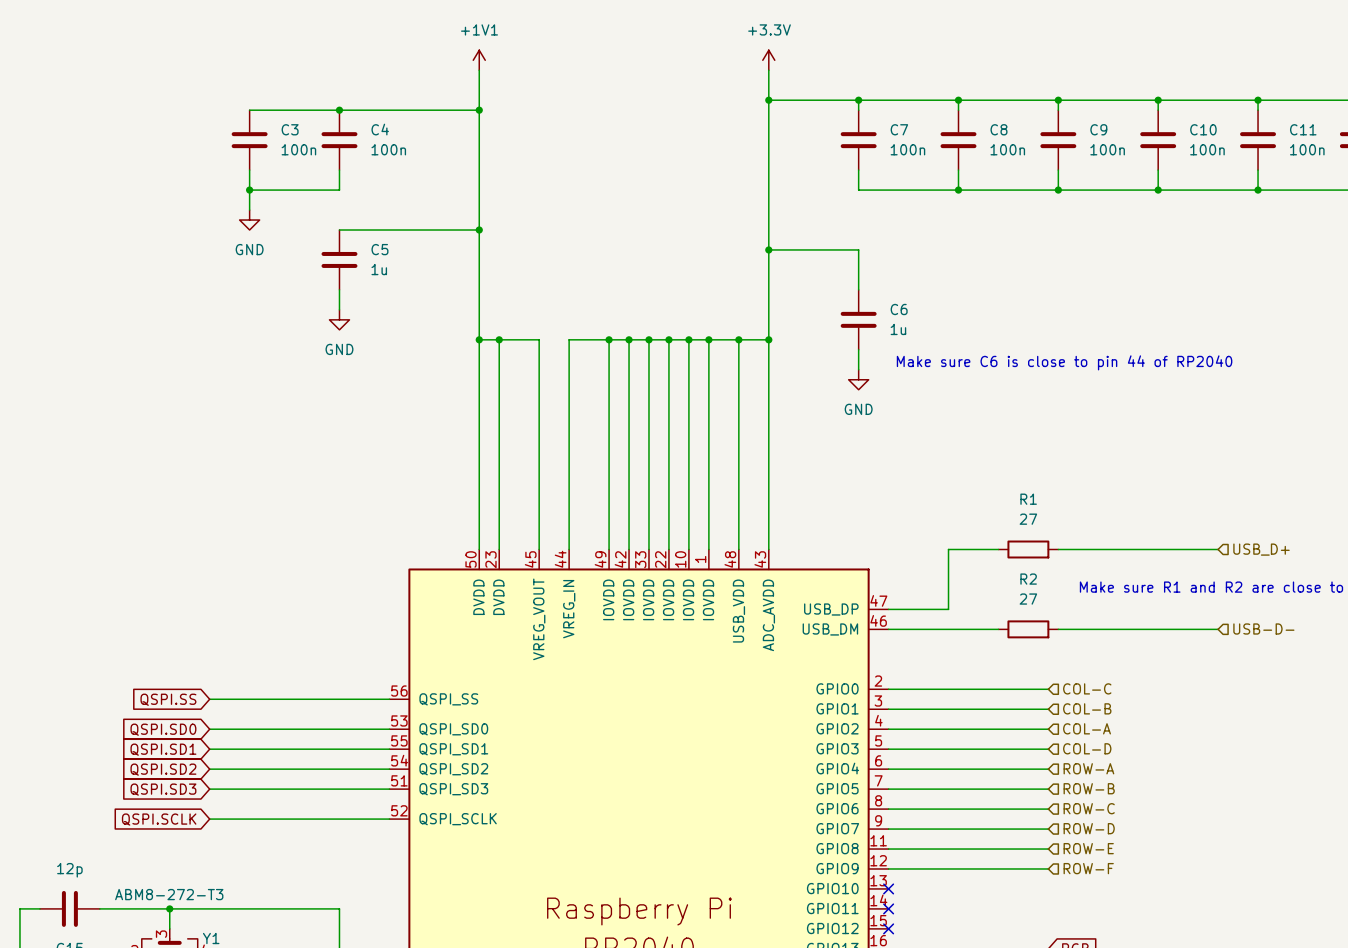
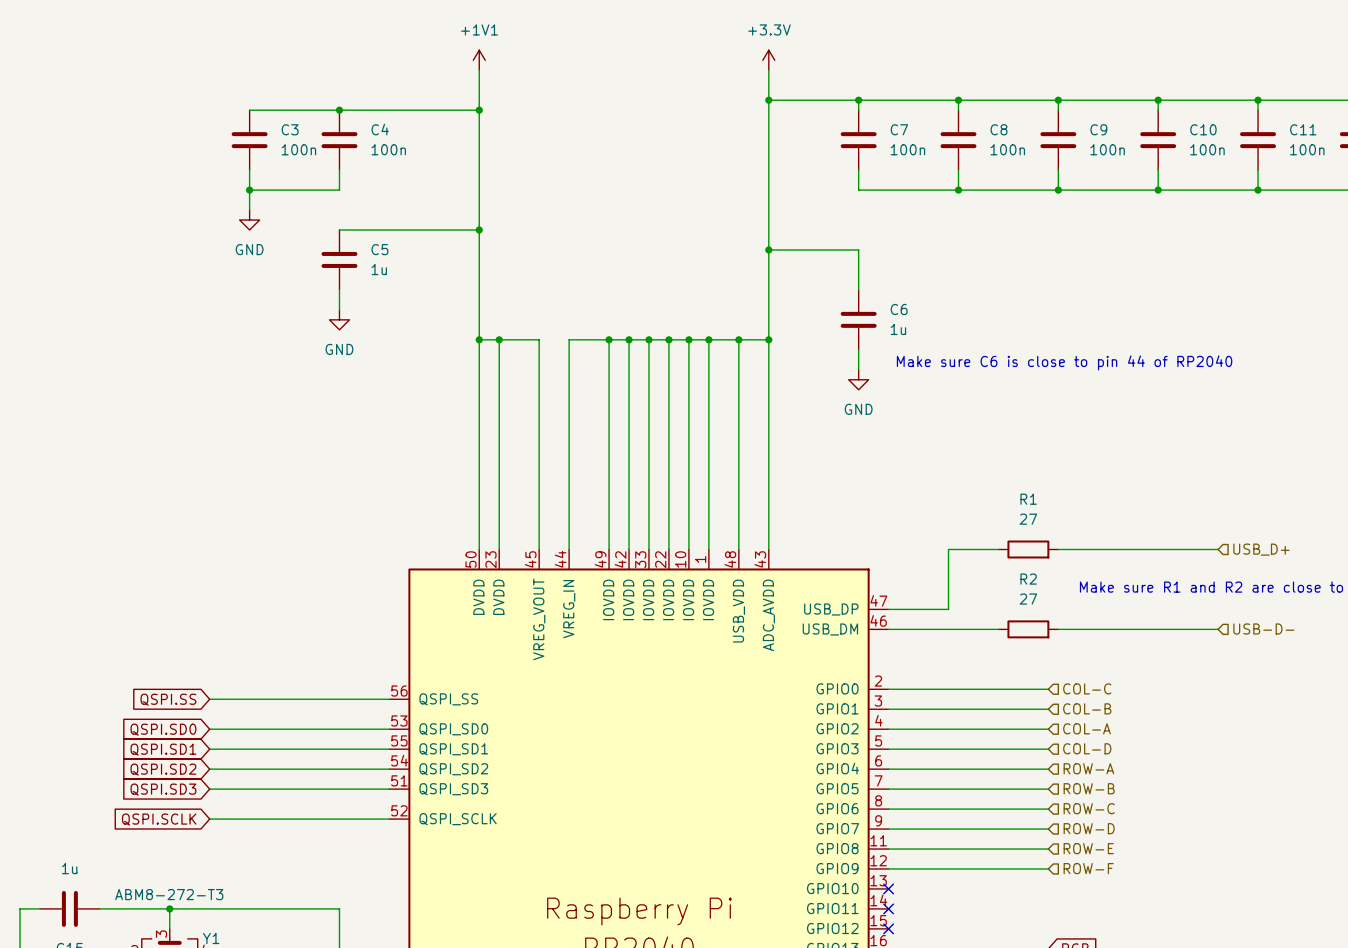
part value: 12p (69, 870) -> 1u (69, 868)

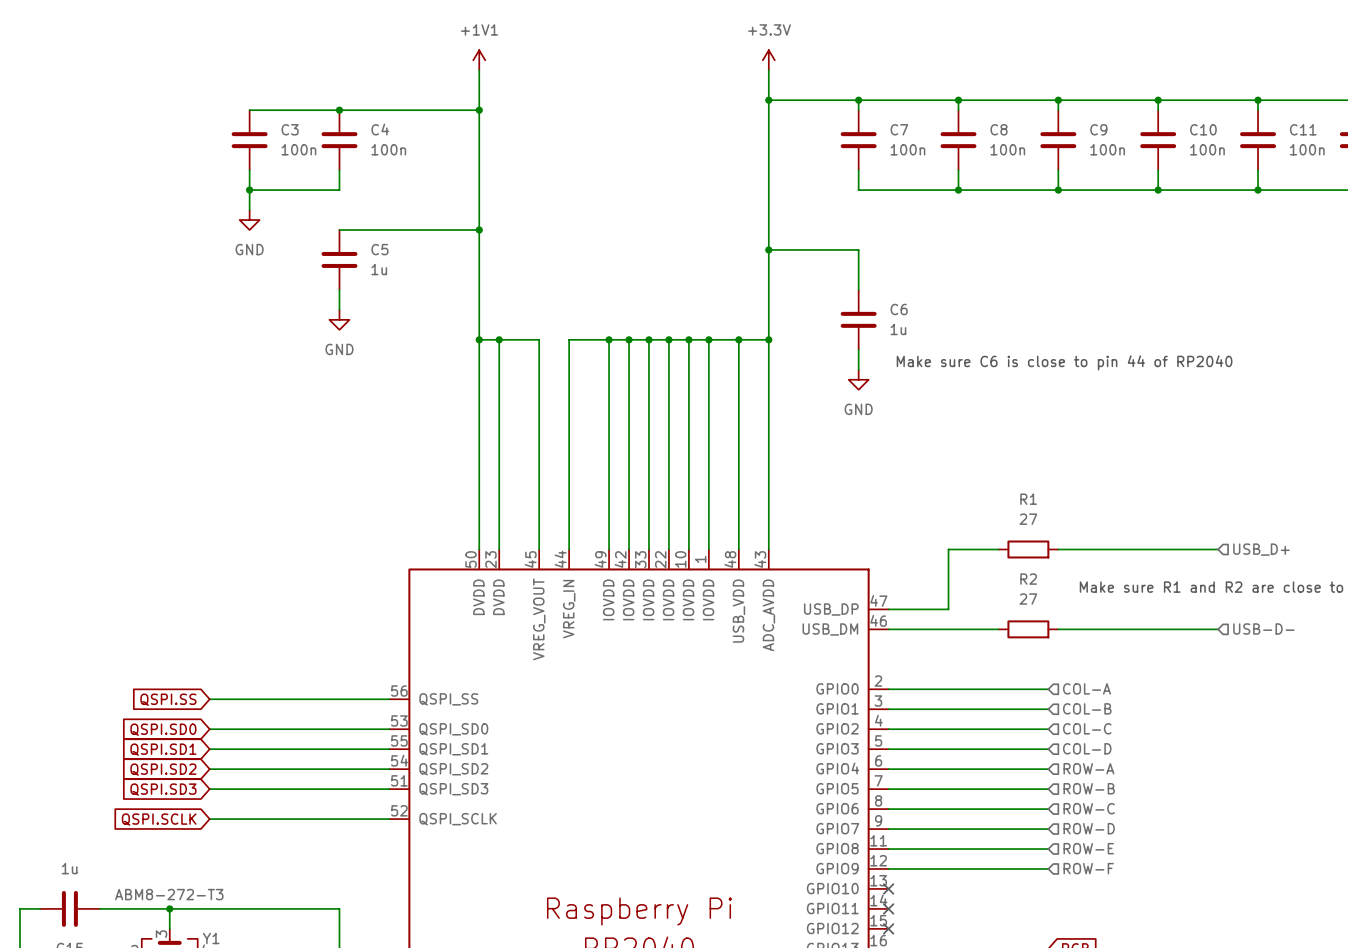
hierarchical label: COL-C (1087, 688) -> COL-A (1087, 688)
hierarchical label: COL-A (1087, 728) -> COL-C (1087, 728)

